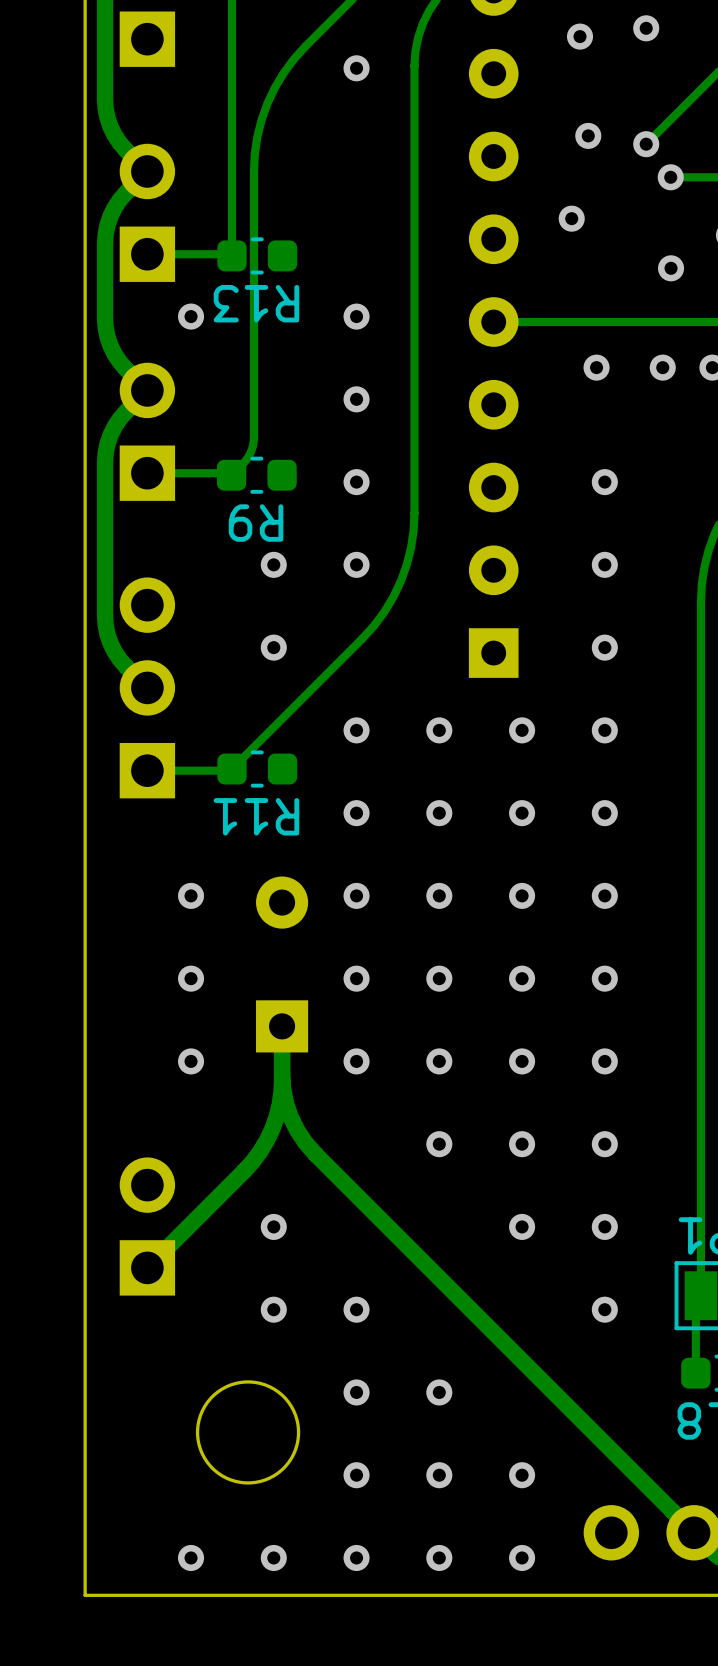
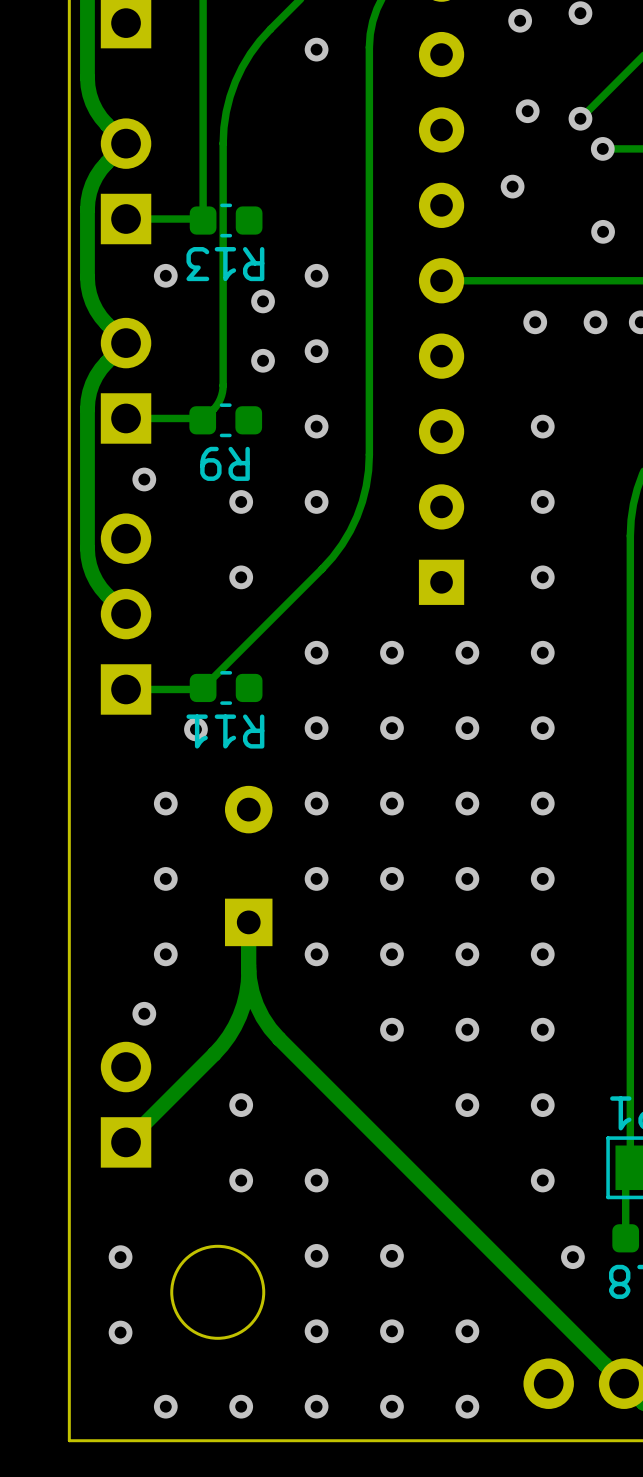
via: none -> (263, 301)
via: none -> (263, 360)
via: none -> (144, 479)
via: none -> (195, 729)
via: none -> (144, 1013)
via: none -> (120, 1257)
via: none -> (572, 1257)
via: none -> (120, 1332)

